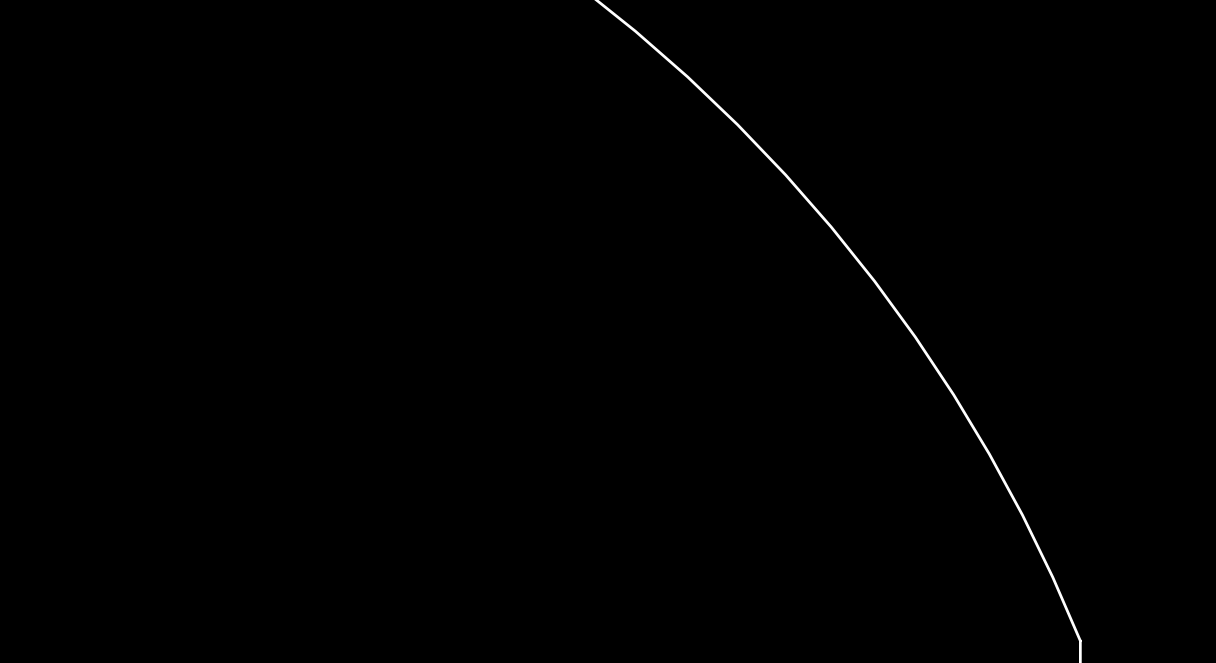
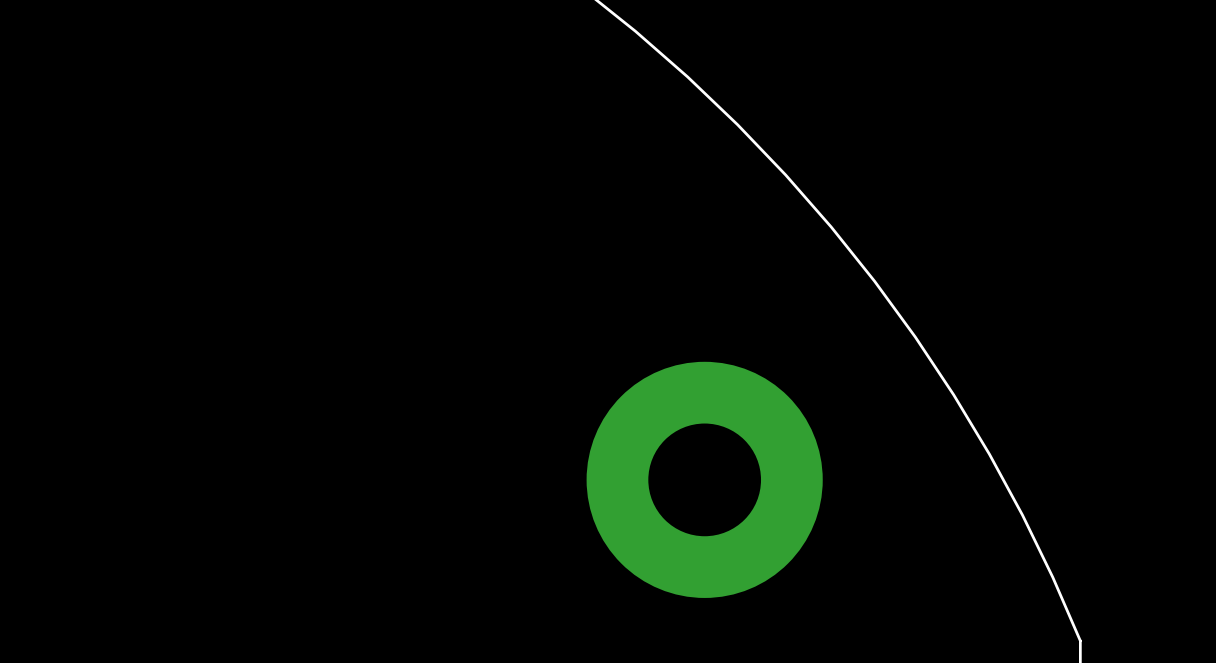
part: none -> (704, 479)

